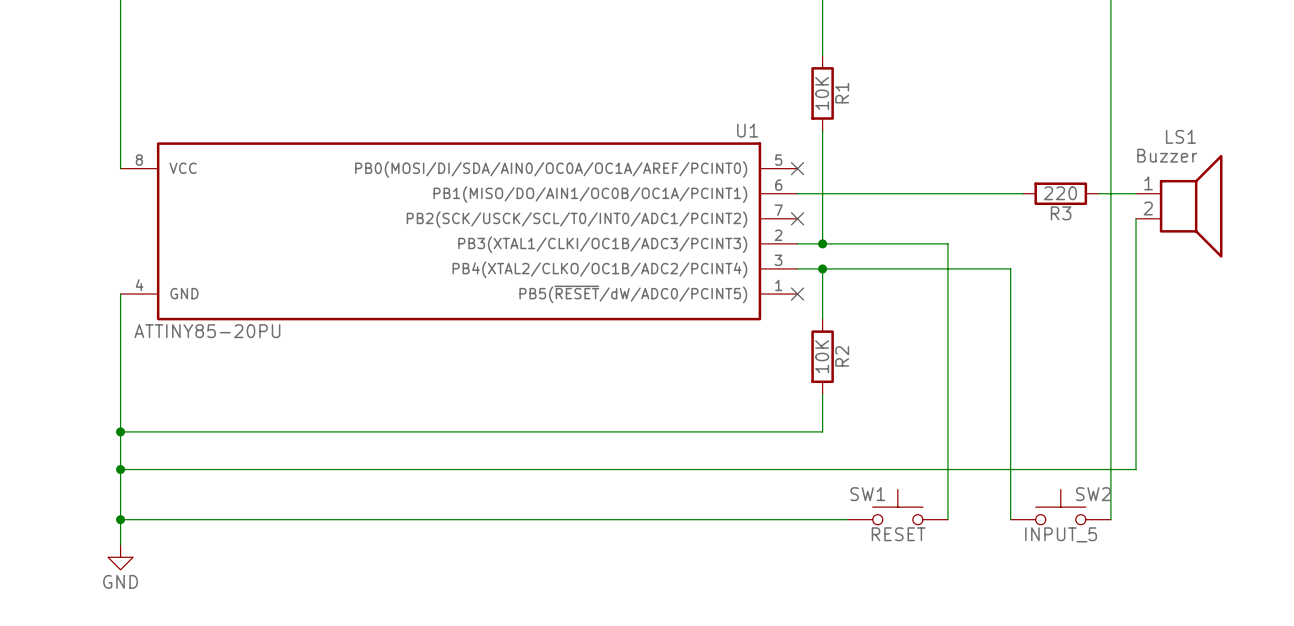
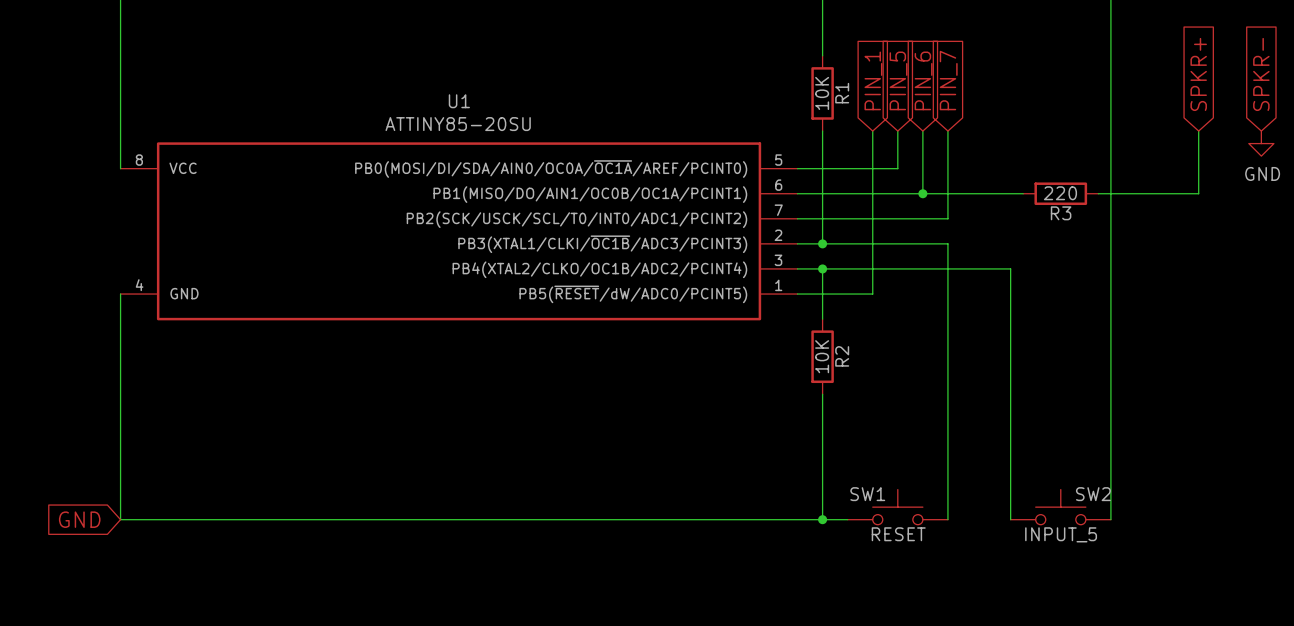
global label: none -> SPKR+ (1198, 74)
global label: none -> SPKR- (1261, 74)
global label: none -> PIN_1 (873, 80)
global label: none -> PIN_5 (898, 80)
global label: none -> PIN_6 (923, 80)
global label: none -> PIN_7 (948, 80)
U1 name position: U1 (747, 130) -> U1 (459, 101)
wire: none -> (872, 131) (872, 294) (797, 294)
wire: none -> (897, 131) (897, 168) (797, 168)
wire: none -> (922, 131) (922, 193)
wire: none -> (947, 131) (947, 218) (797, 218)
wire: none -> (1198, 131) (1198, 193) (1136, 193)
power symbol: none -> GND (1261, 143)
no-connect mark: (797, 168) -> none
U1 pin name: PB0(MOSI/DI/SDA/AIN0/OC0A/OC1A/AREF/PCINT0) (551, 169) -> PB0(MOSI/DI/SDA/AIN0/OC0A/~{OC1A}/AREF/PCINT0) (551, 169)
junction: none -> (922, 193)
LS1: Buzzer (1179, 206) -> none
no-connect mark: (797, 218) -> none
wire: (1136, 218) (1136, 469) (120, 469) -> none
U1 pin name: PB3(XTAL1/CLKI/OC1B/ADC3/PCINT3) (602, 244) -> PB3(XTAL1/CLKI/~{OC1B}/ADC3/PCINT3) (602, 244)
no-connect mark: (797, 294) -> none
U1 value: ATTINY85-20PU (207, 331) -> ATTINY85-20SU (458, 124)
wire: (120, 431) (822, 431) -> (822, 519) (822, 431)
junction: (120, 431) -> none
junction: (120, 469) -> none
global label: none -> GND (79, 519)
wire: (120, 519) (120, 544) -> none
junction: (120, 519) -> none
junction: none -> (822, 519)
power symbol: GND (120, 557) -> none

